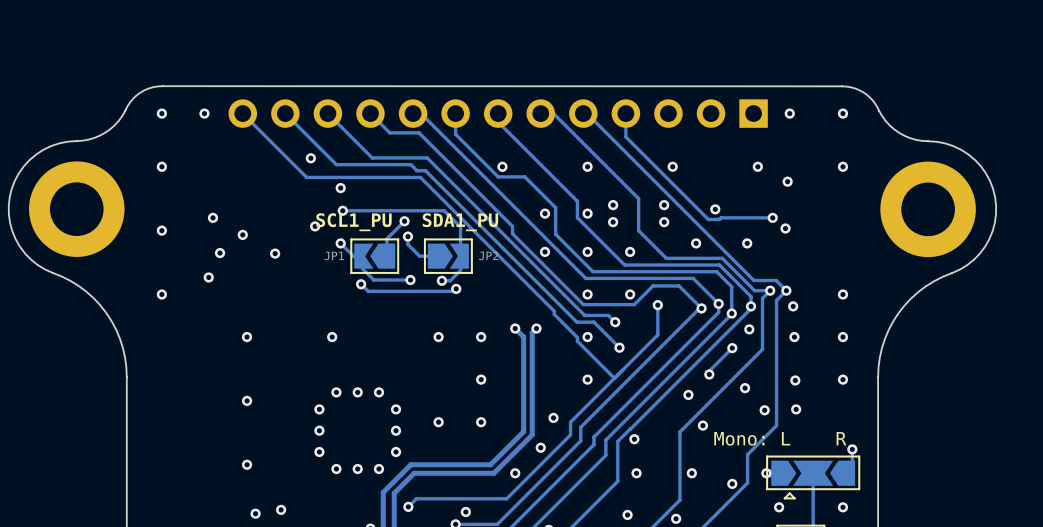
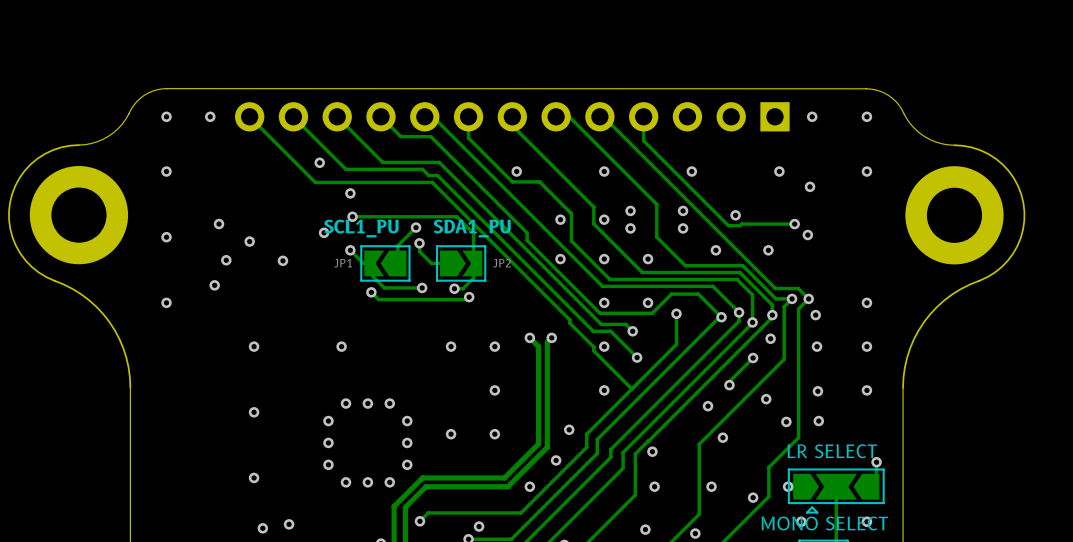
text: Mono: L R (780, 438) -> none
text: none -> LR SELECT (832, 451)
text: none -> MONO SELECT (824, 523)

